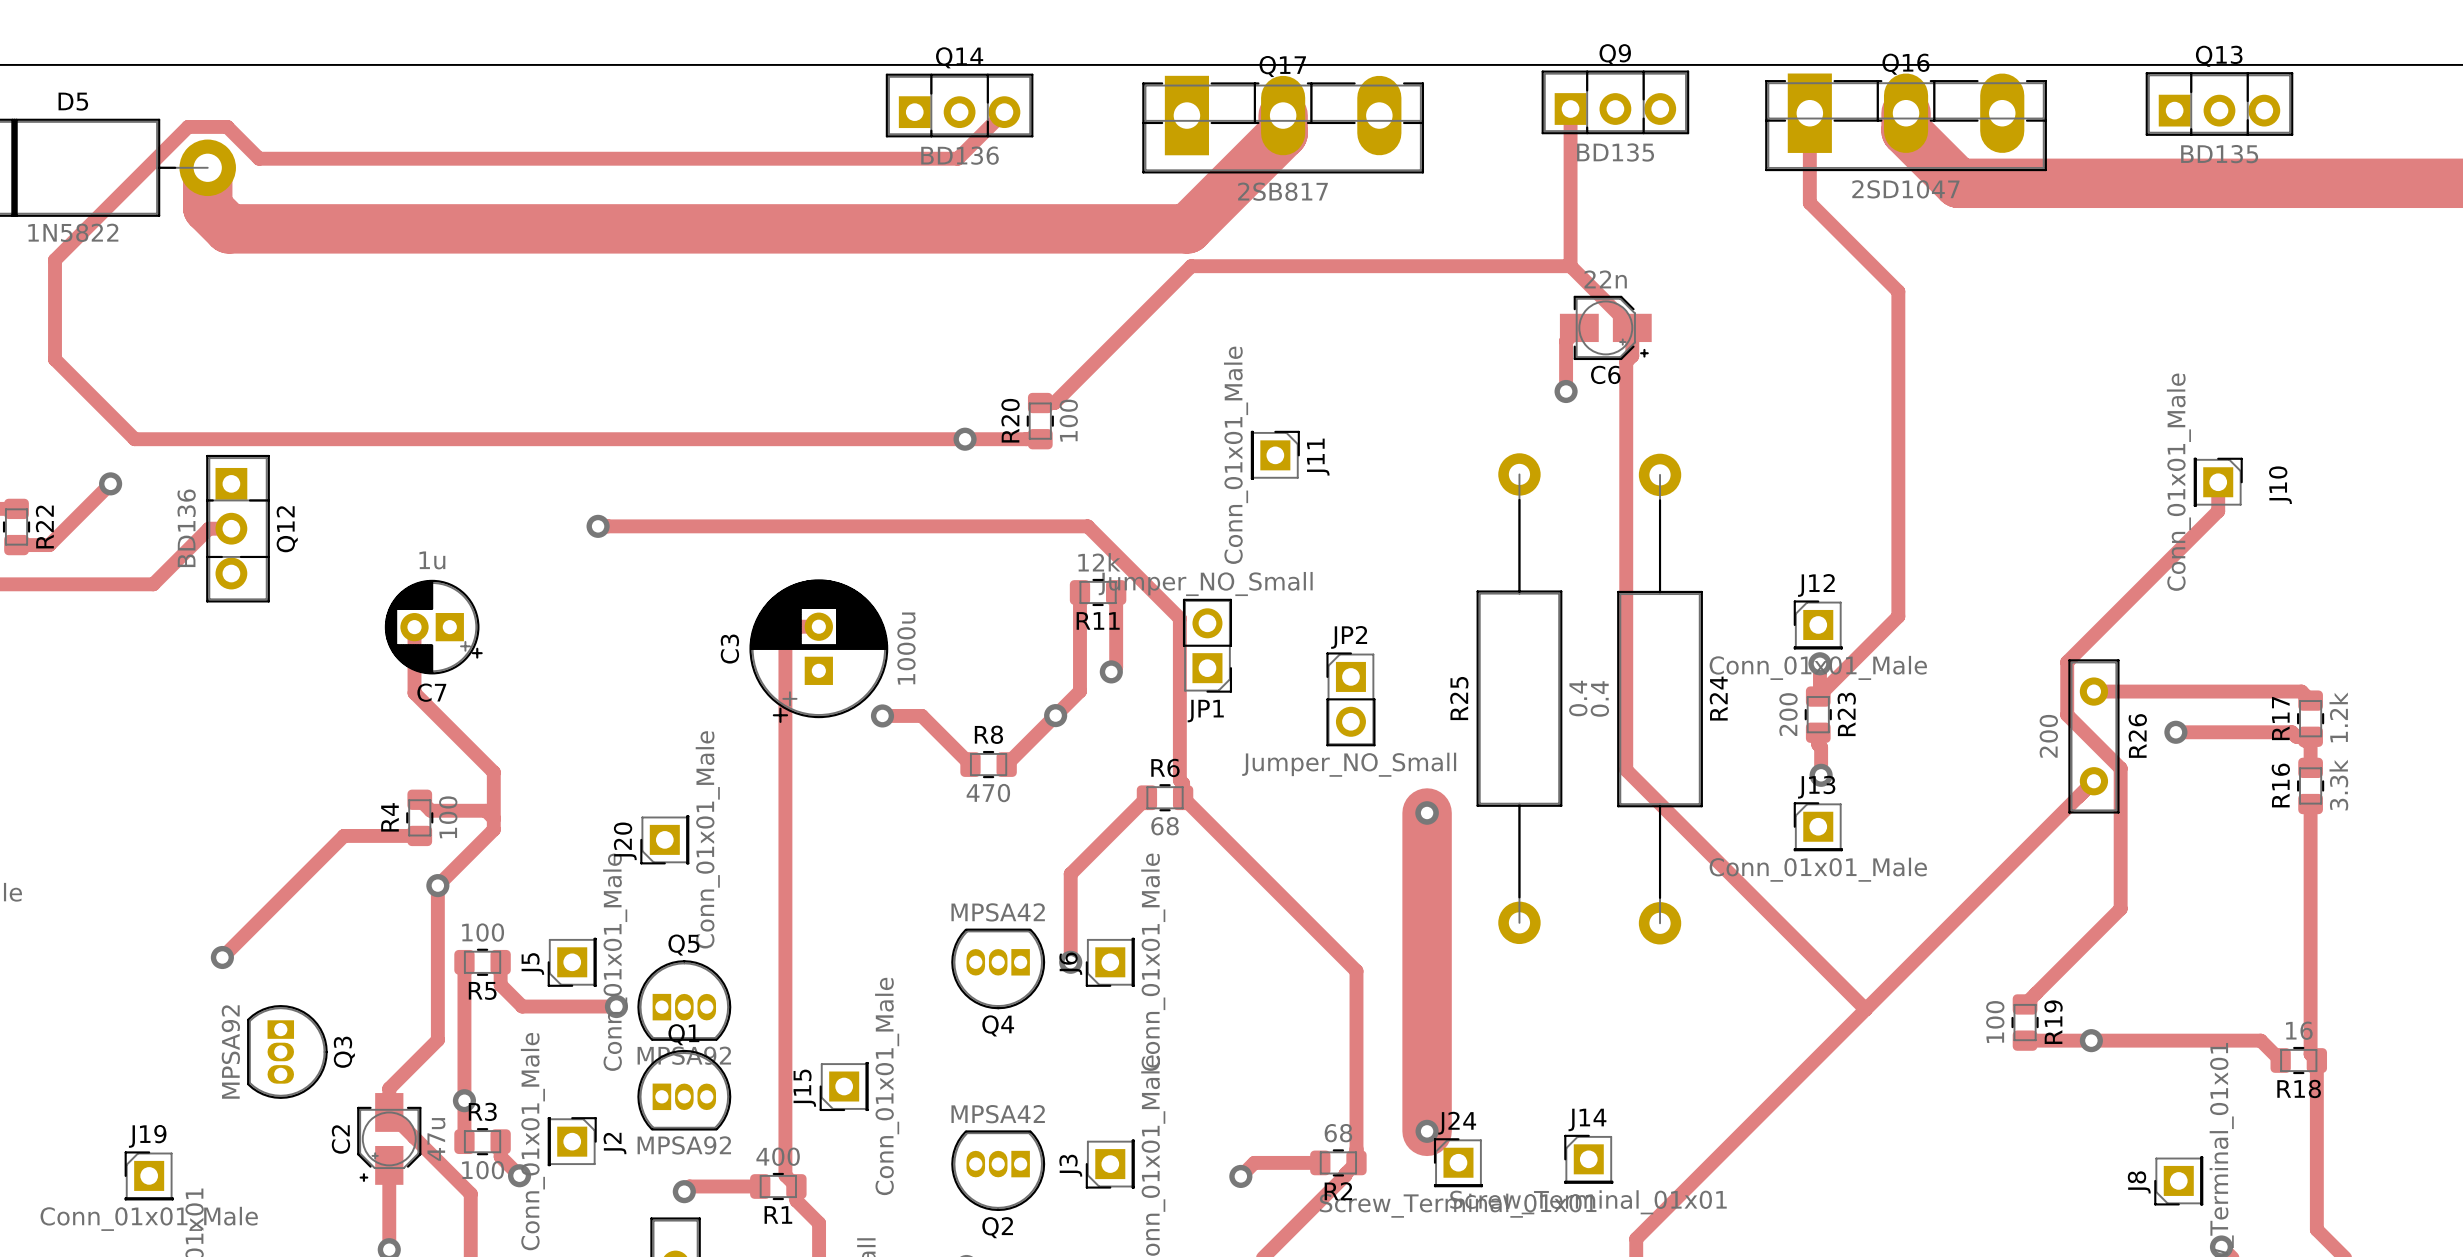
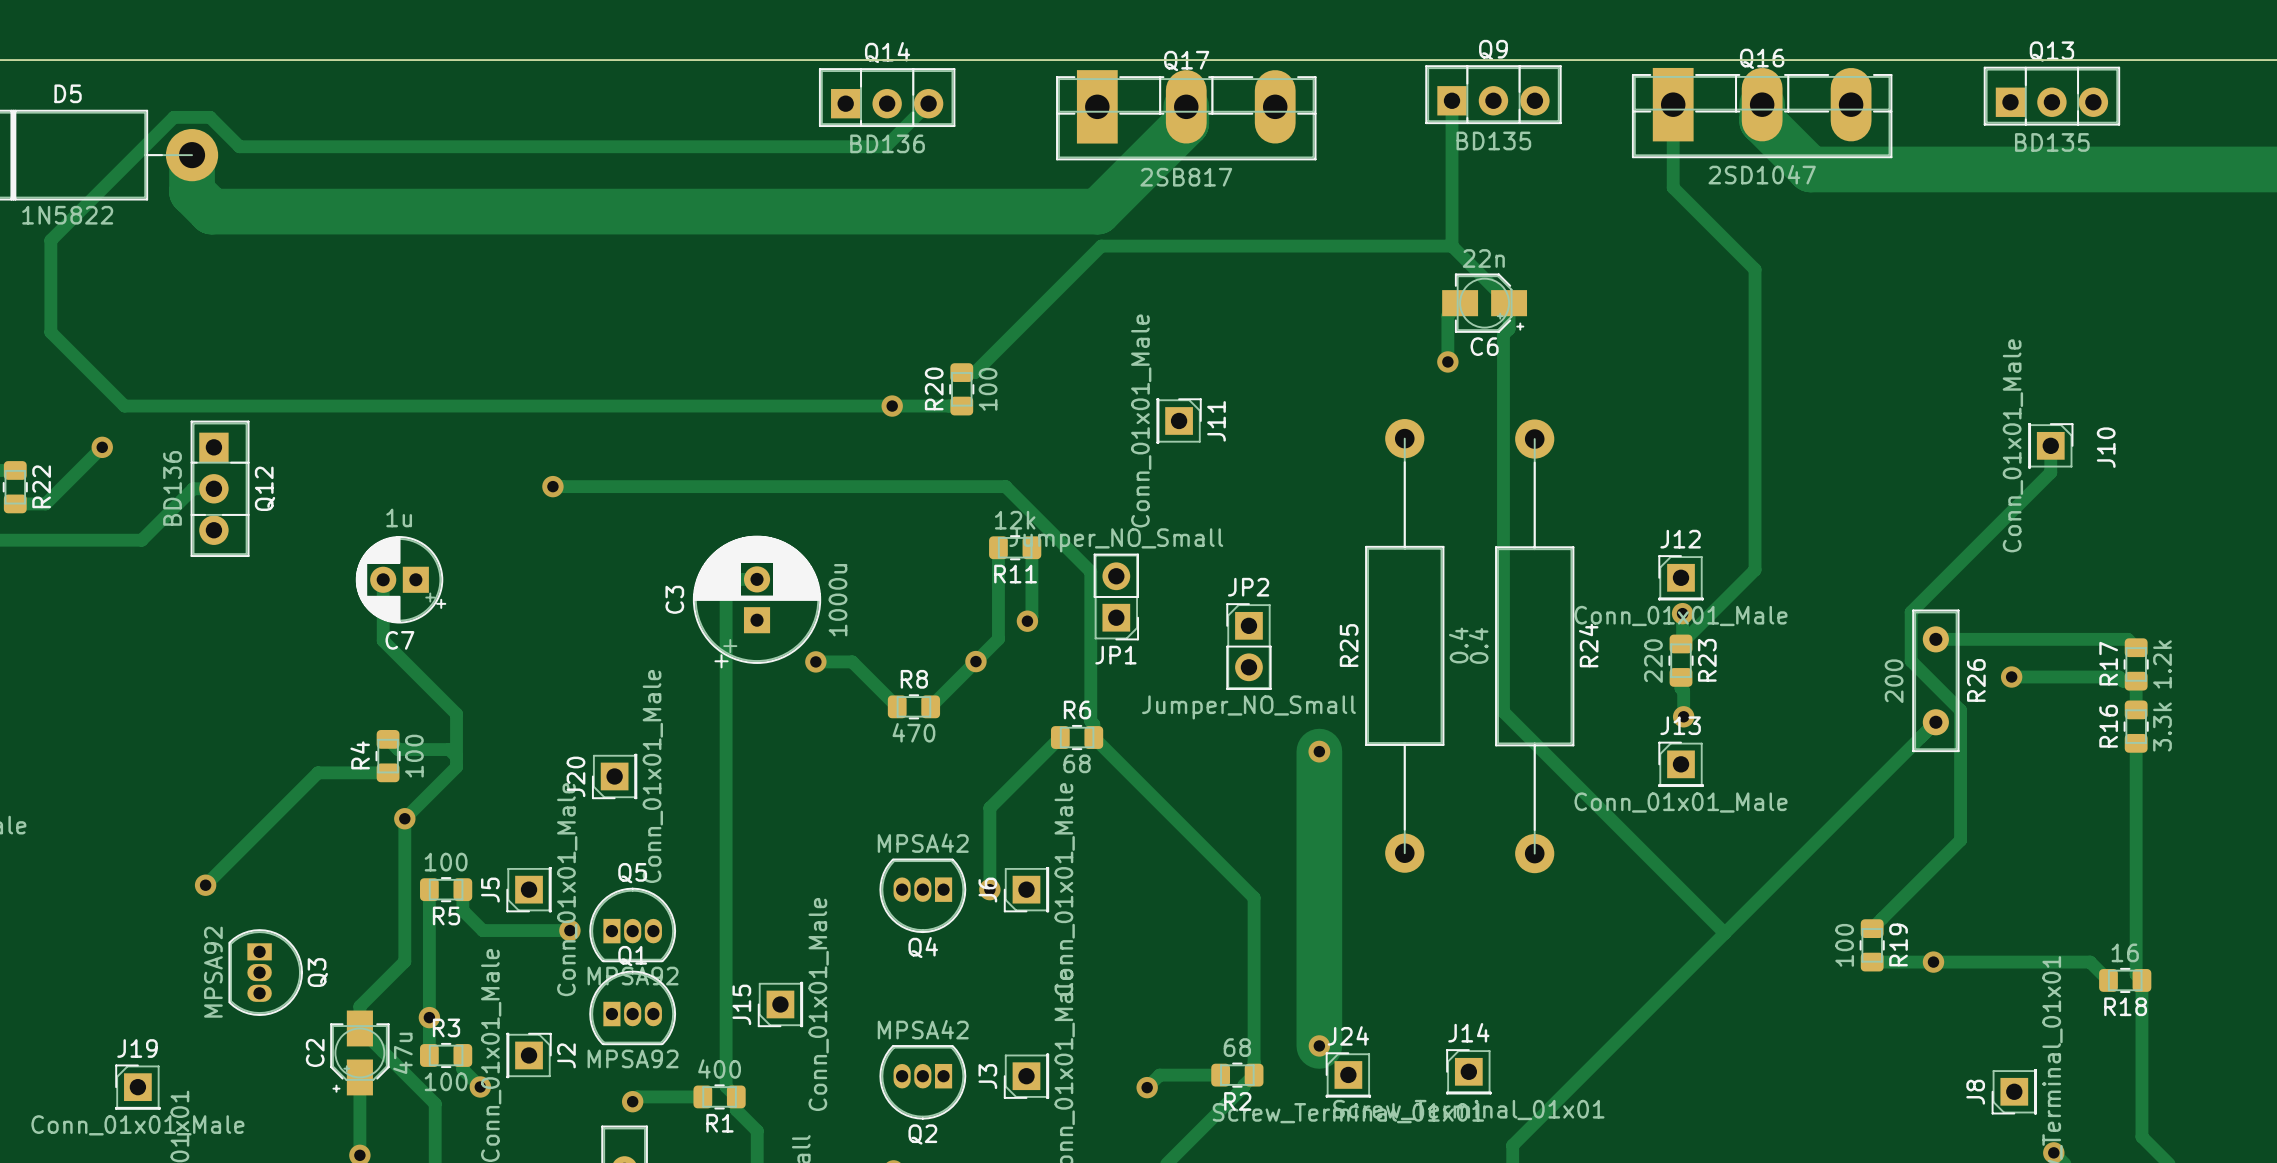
R23 value: 200 (1788, 714) -> 220 (1653, 661)

